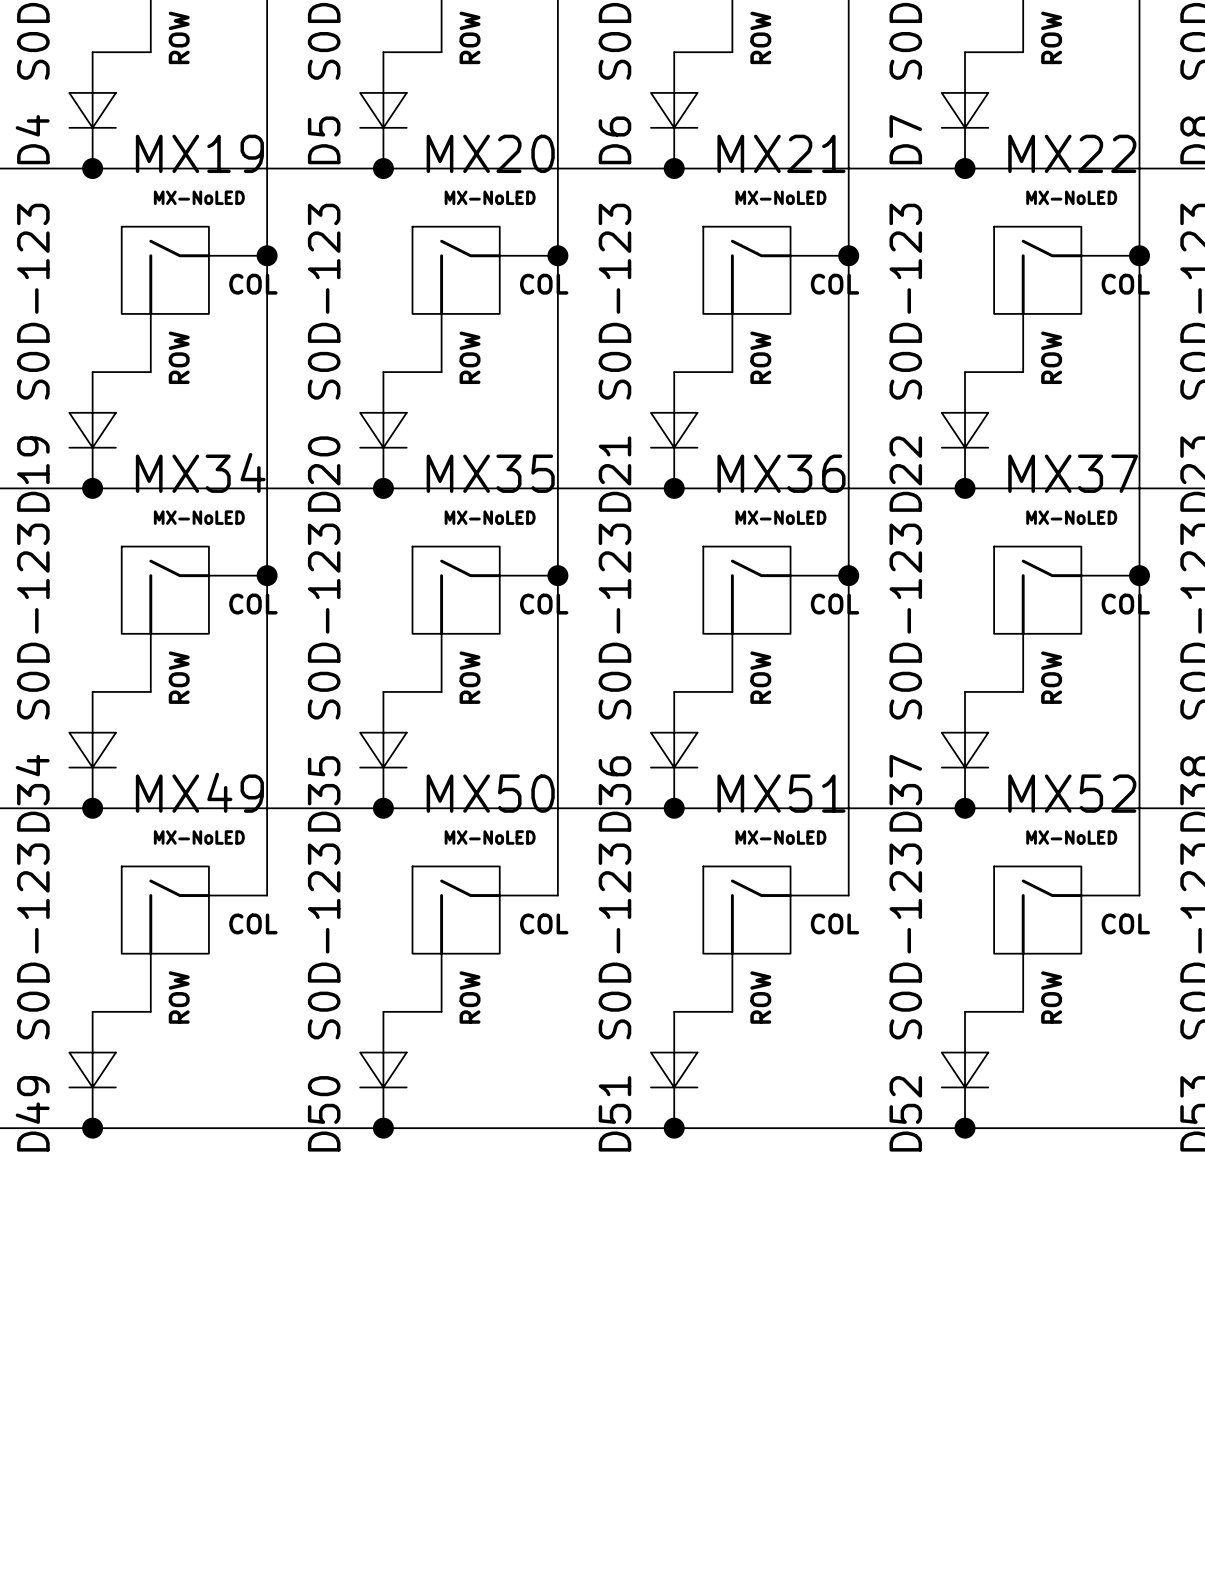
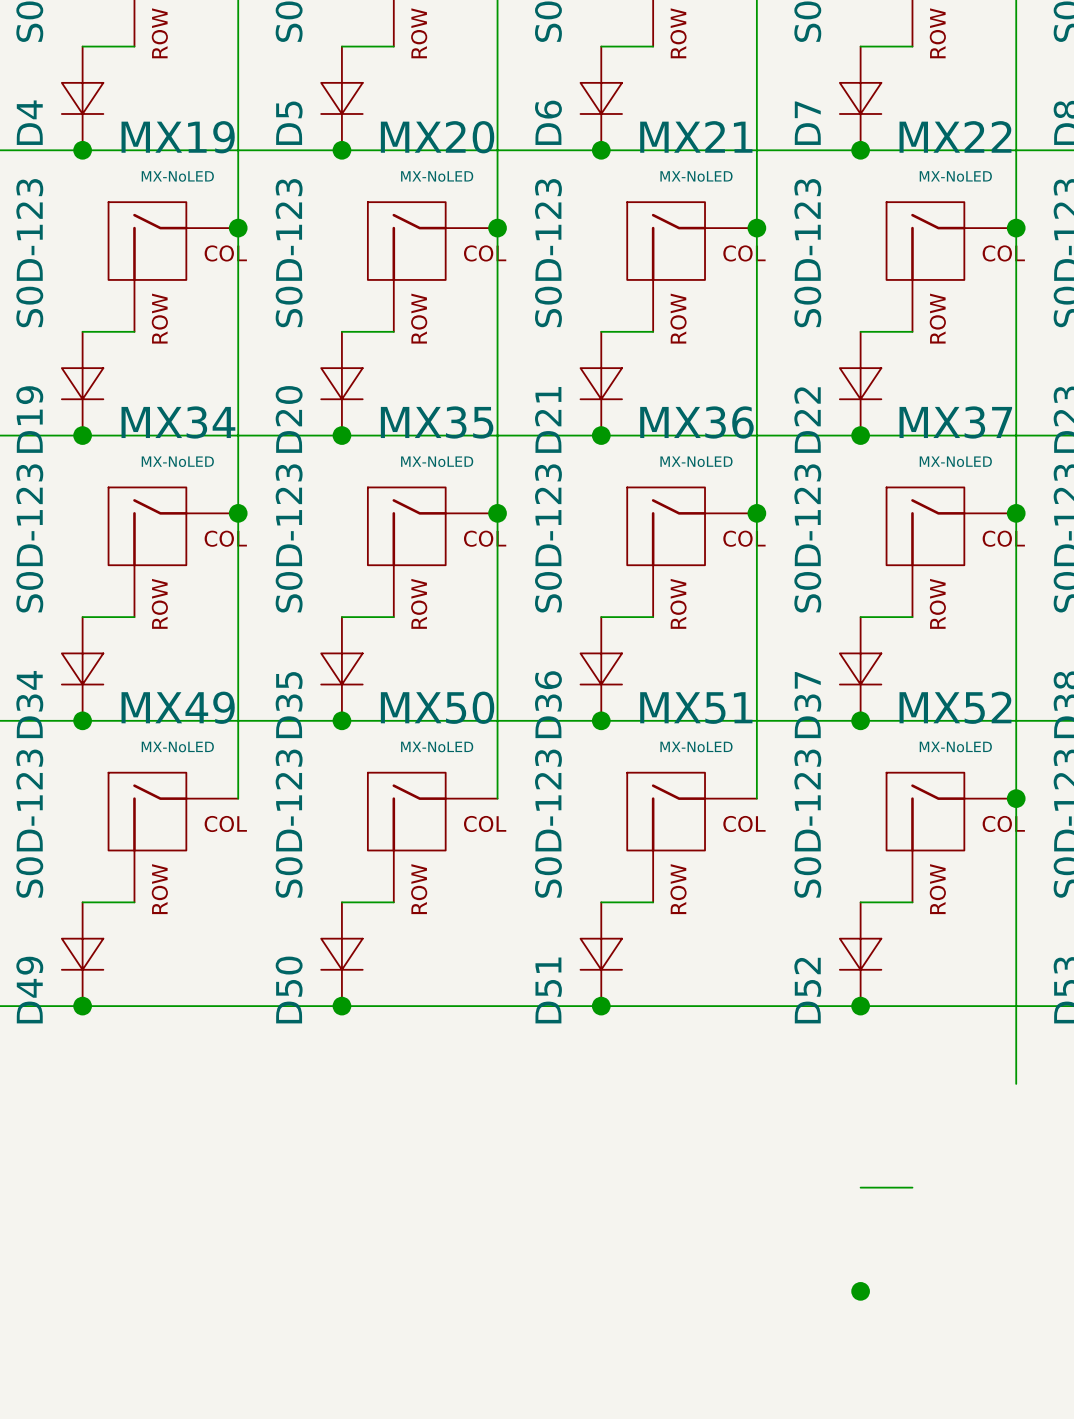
wire: none -> (1016, 798) (1016, 1083)
junction: none -> (1016, 798)
wire: none -> (860, 1187) (912, 1187)
junction: none -> (860, 1291)

